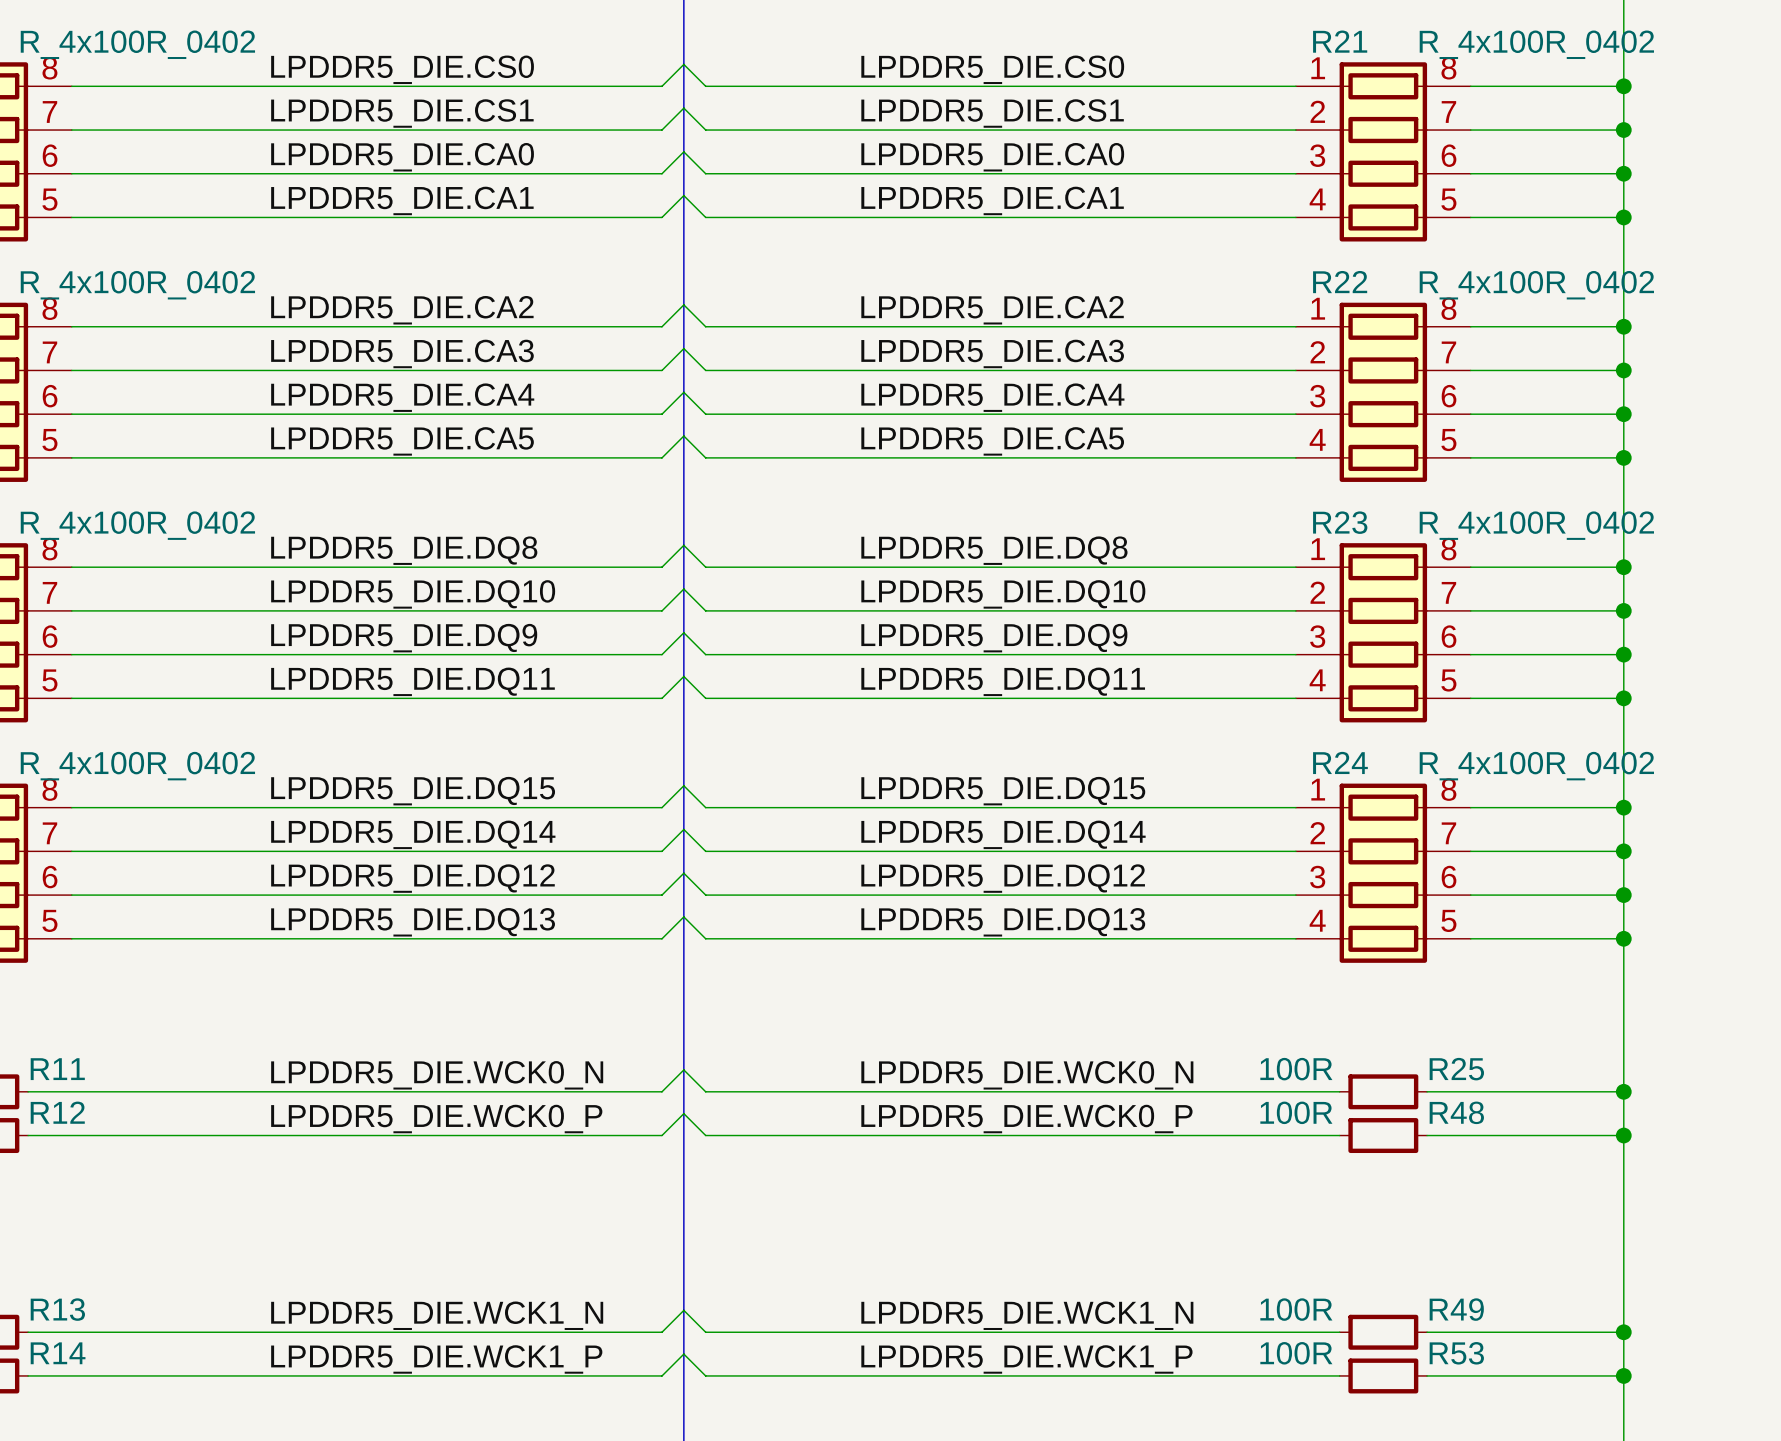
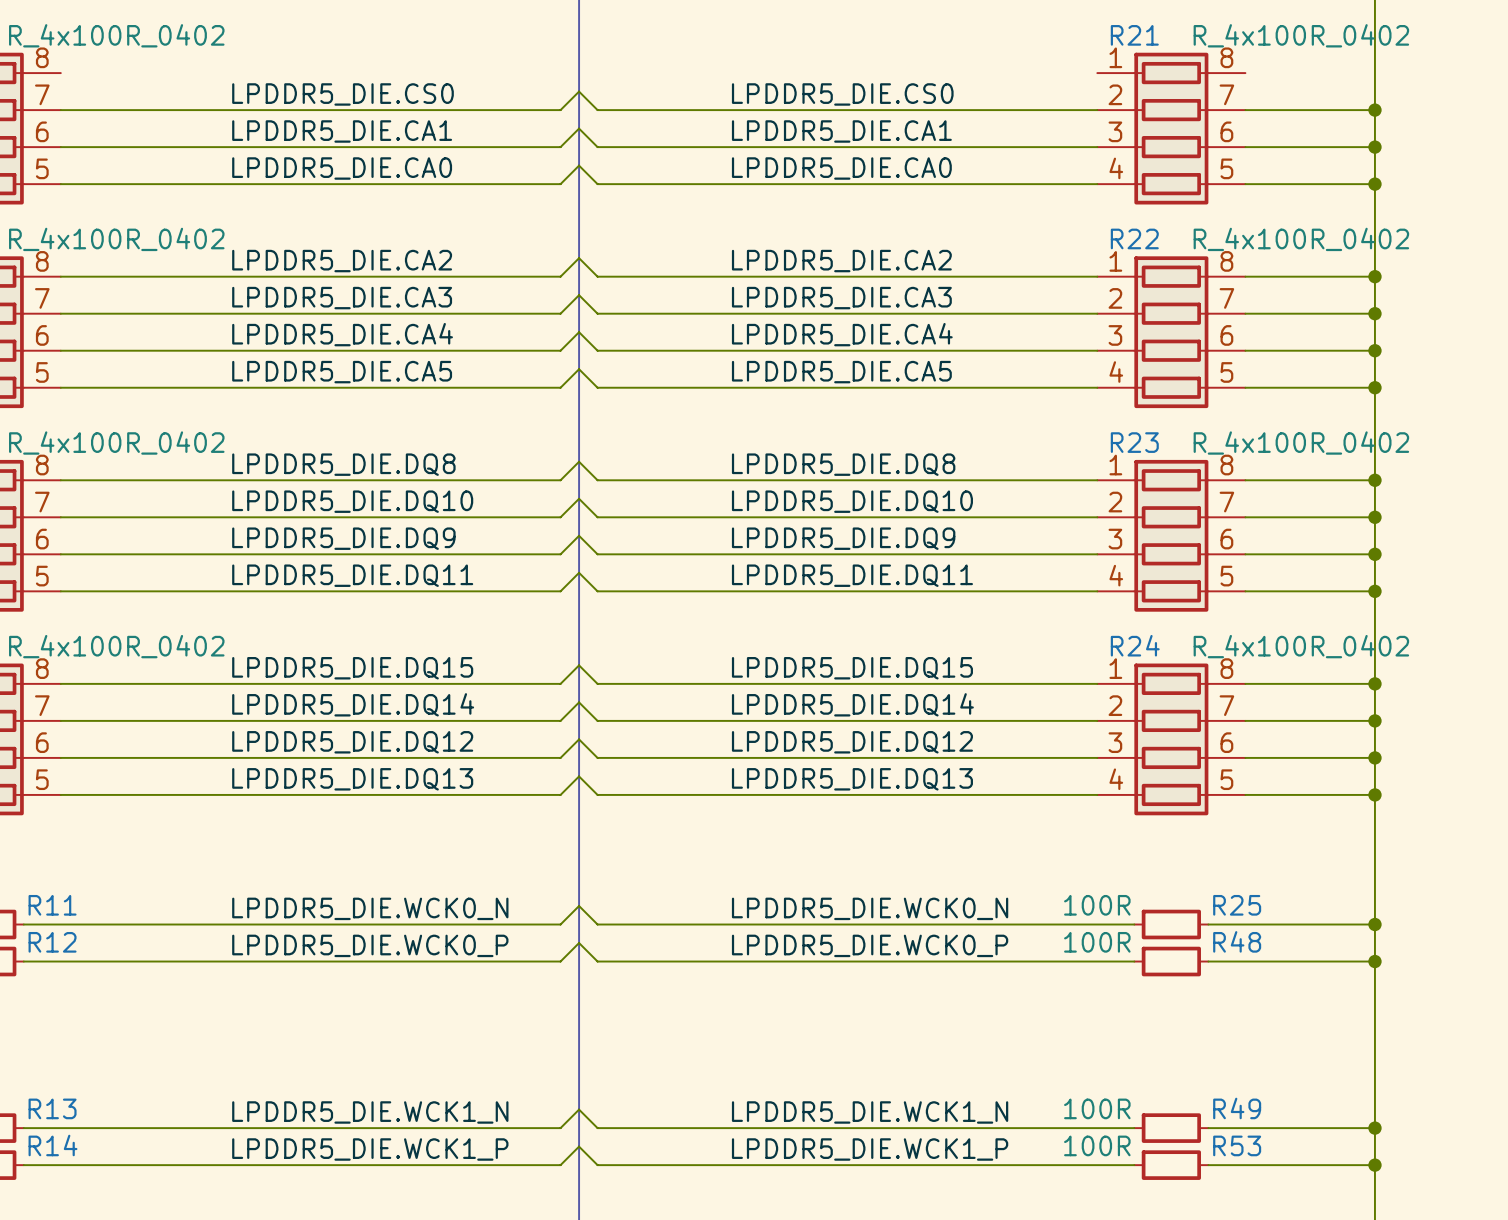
label: LPDDR5_DIE.CS0 (402, 69) -> none
label: LPDDR5_DIE.CS0 (992, 69) -> none
wire: (71, 86) (662, 86) (683, 64) (705, 86) (1295, 86) -> none
wire: (1470, 86) (1623, 86) -> none
junction: (1623, 86) -> none
label: LPDDR5_DIE.CS1 (402, 113) -> LPDDR5_DIE.CS0 (342, 94)
label: LPDDR5_DIE.CS1 (992, 113) -> LPDDR5_DIE.CS0 (842, 94)
label: LPDDR5_DIE.CA0 (402, 157) -> LPDDR5_DIE.CA1 (342, 131)
label: LPDDR5_DIE.CA0 (992, 157) -> LPDDR5_DIE.CA1 (841, 131)
label: LPDDR5_DIE.CA1 (402, 200) -> LPDDR5_DIE.CA0 (342, 168)
label: LPDDR5_DIE.CA1 (992, 200) -> LPDDR5_DIE.CA0 (841, 168)

